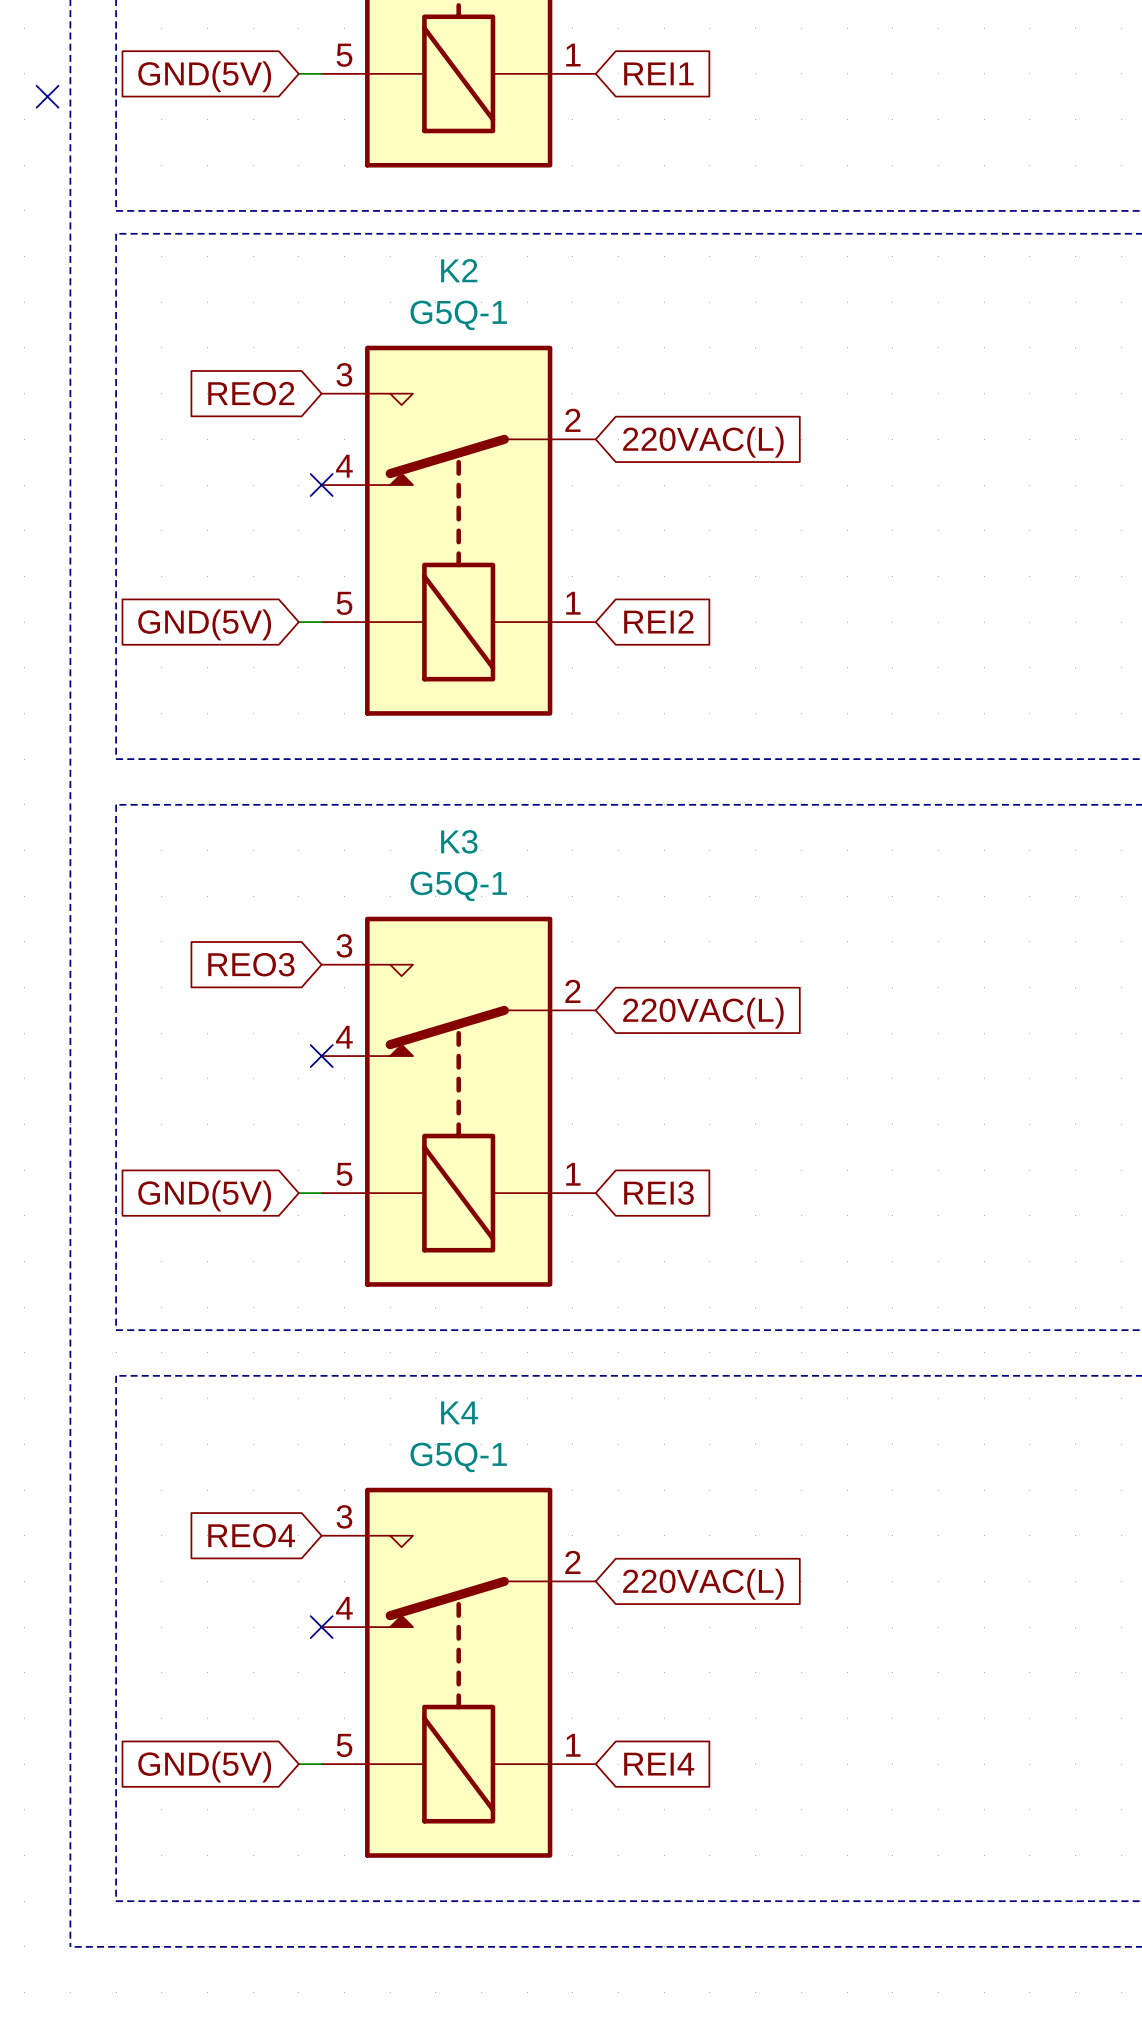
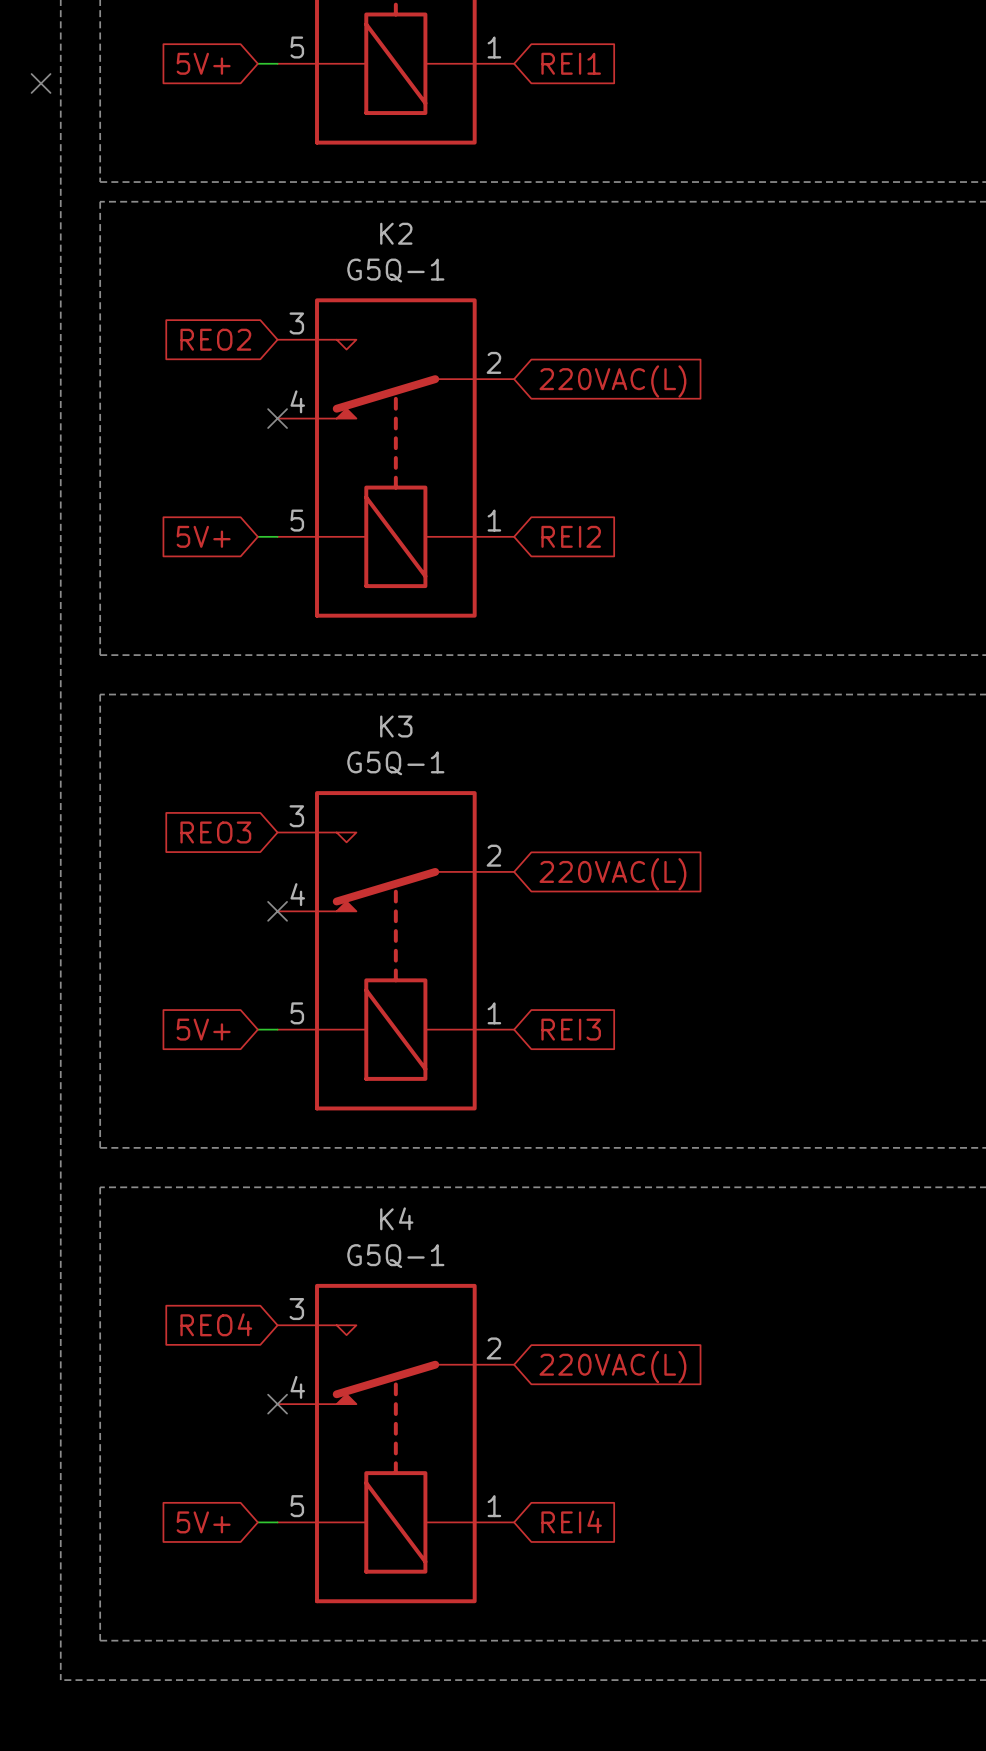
global label: GND(5V) (204, 76) -> 5V+ (203, 63)
global label: GND(5V) (204, 624) -> 5V+ (203, 536)
global label: GND(5V) (204, 1195) -> 5V+ (203, 1029)
global label: GND(5V) (204, 1766) -> 5V+ (203, 1522)

